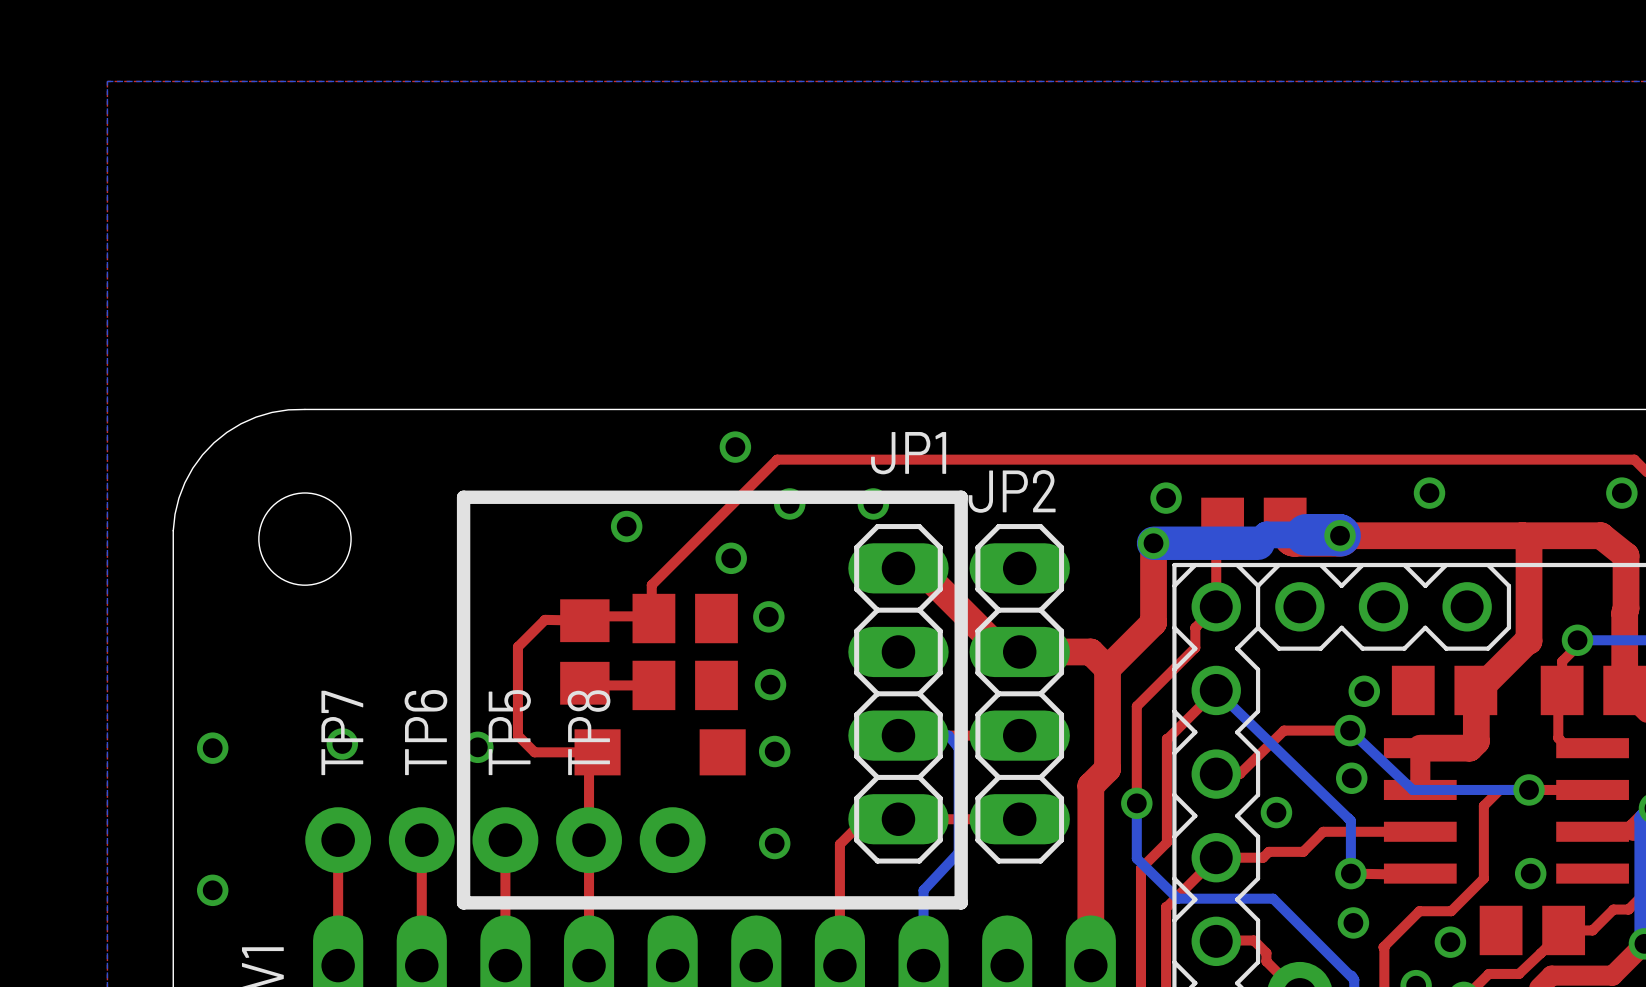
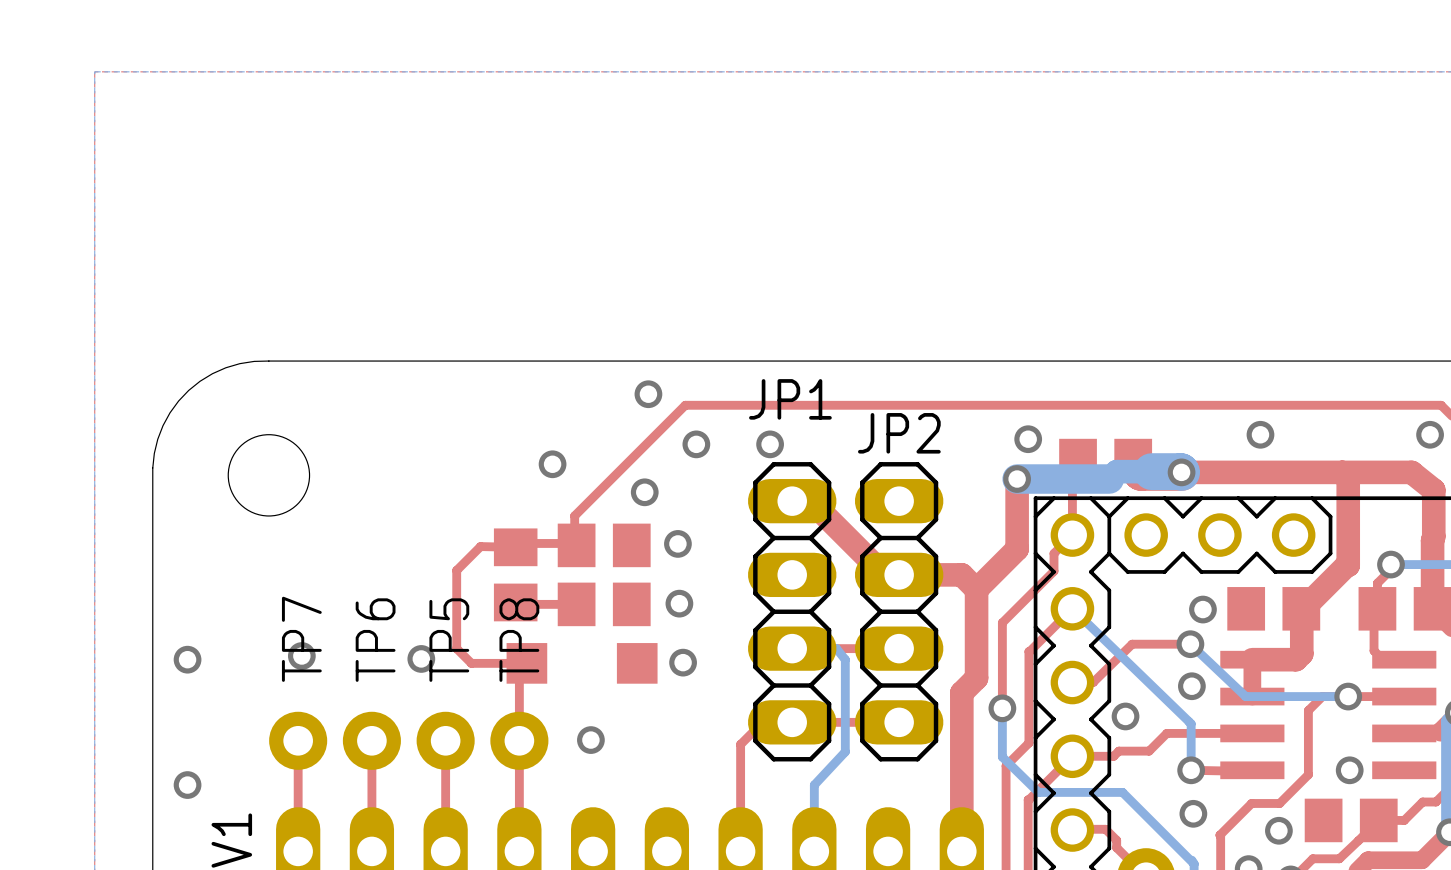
line: (961, 497) (463, 497) (463, 902) (961, 902) (961, 497) -> none
part: (672, 840) -> none
via position: (774, 843) -> (590, 740)

